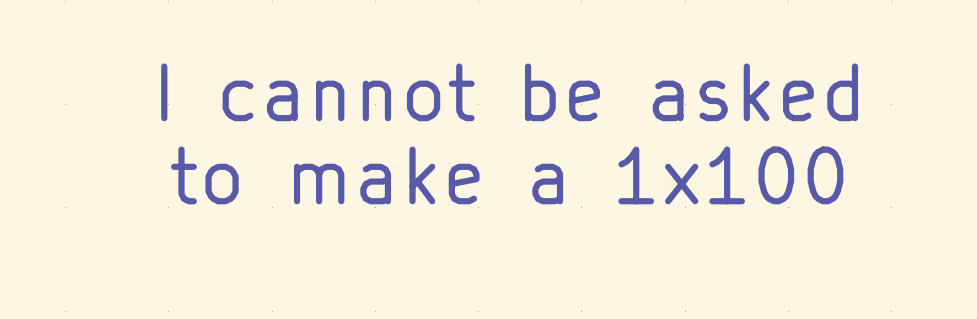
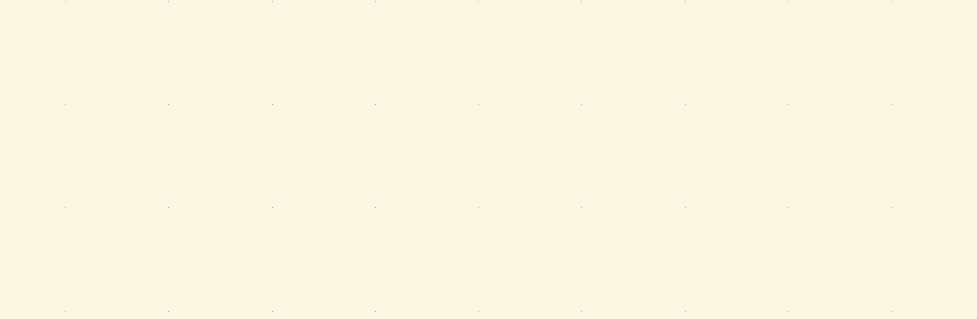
text: I cannot be asked (509, 92) -> none
text: to make a 1x100 (507, 175) -> none

